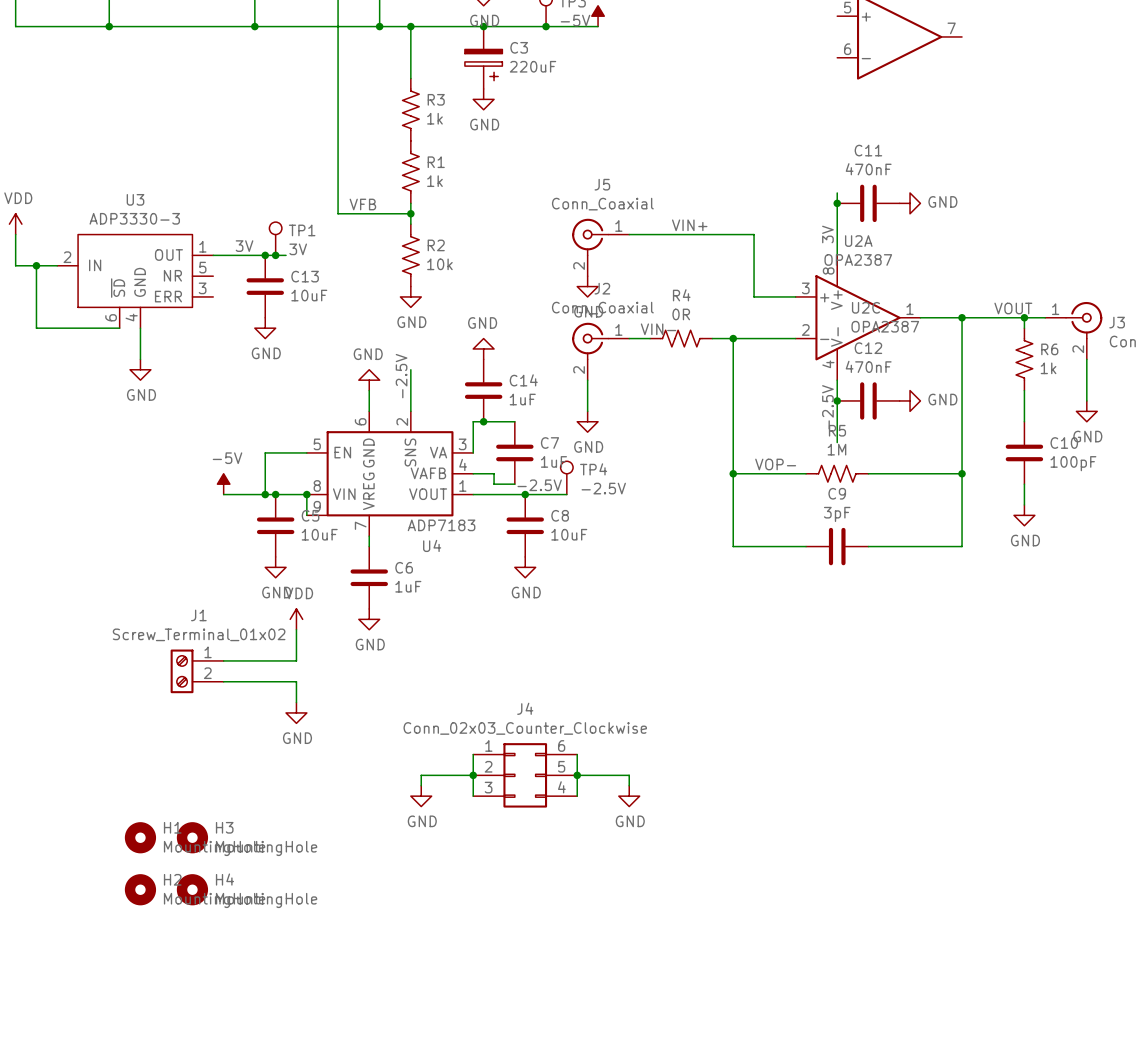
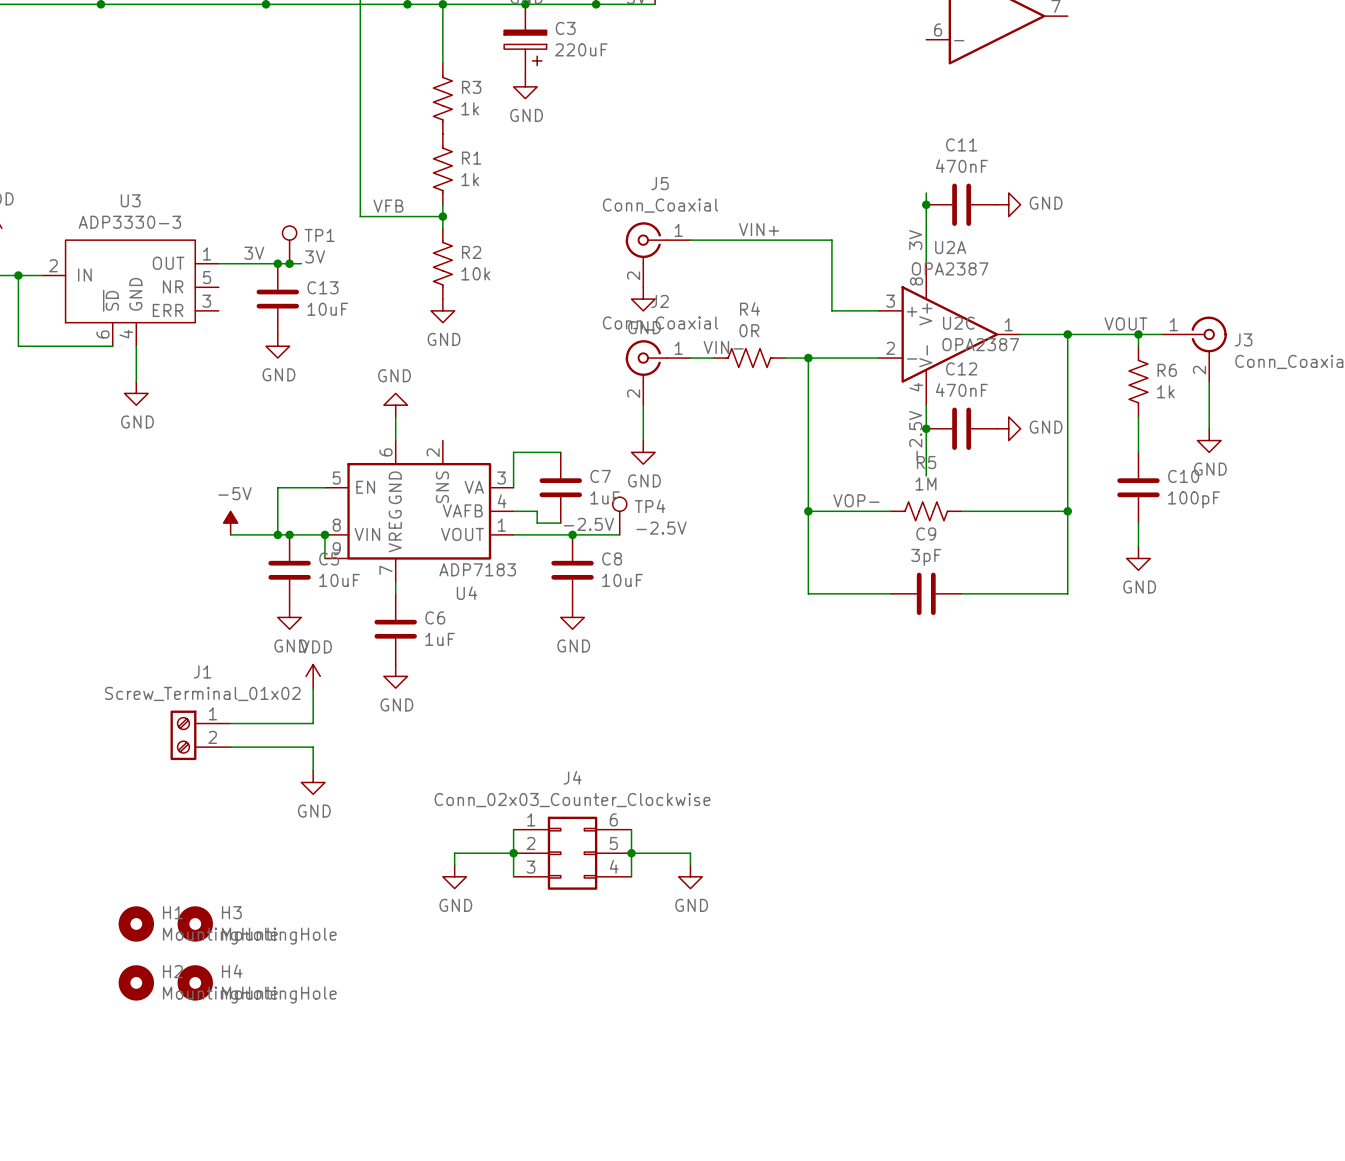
power symbol: GND (483, 348) -> none
wire: (410, 369) (410, 411) -> none
label: -2.5V (401, 376) -> none
C14: 1uF (483, 390) -> none
junction: (483, 421) -> none

